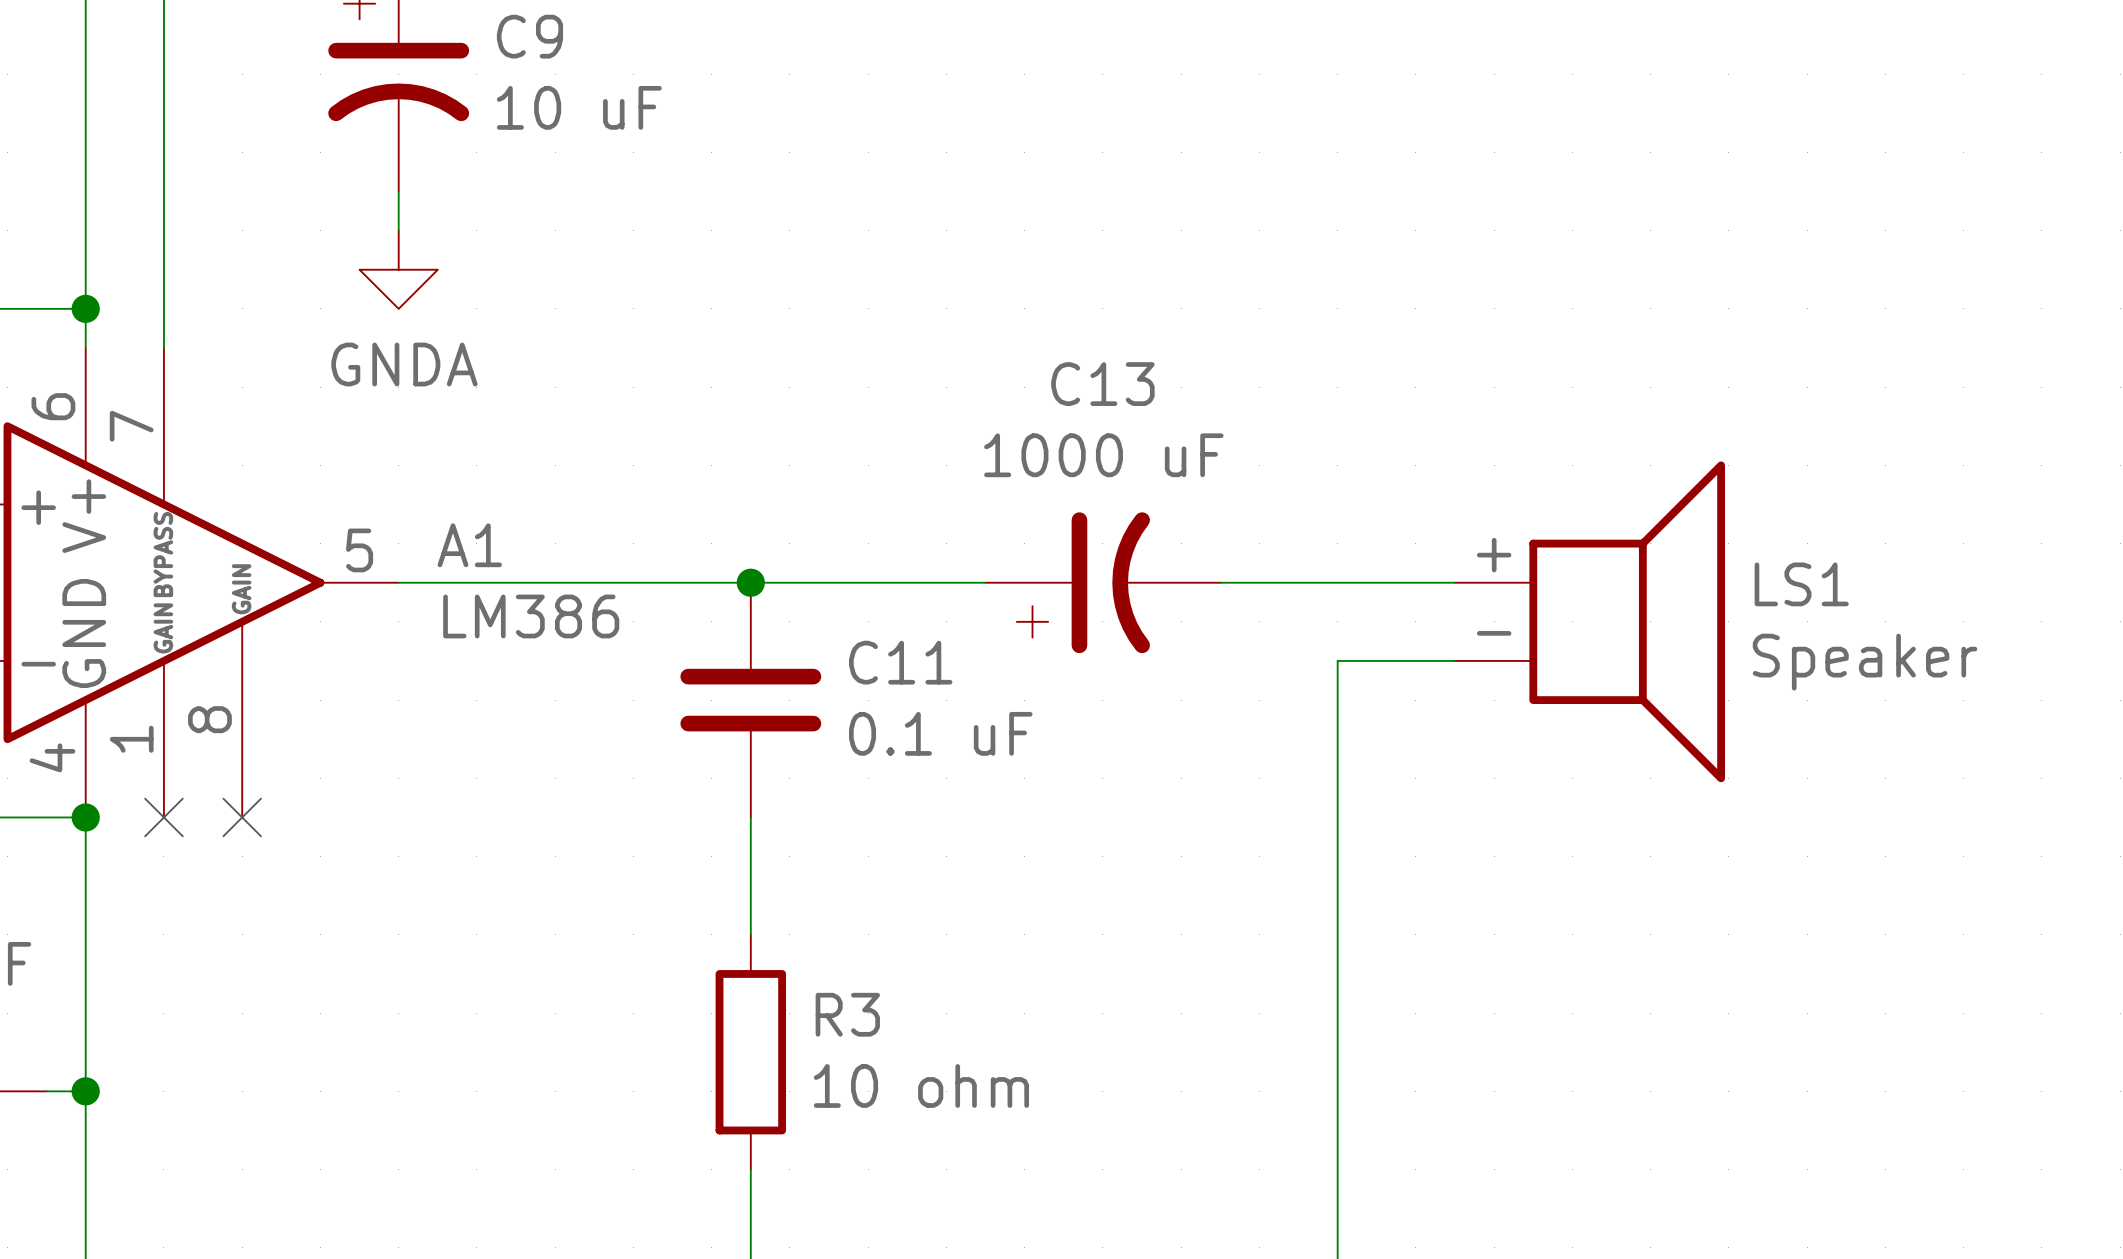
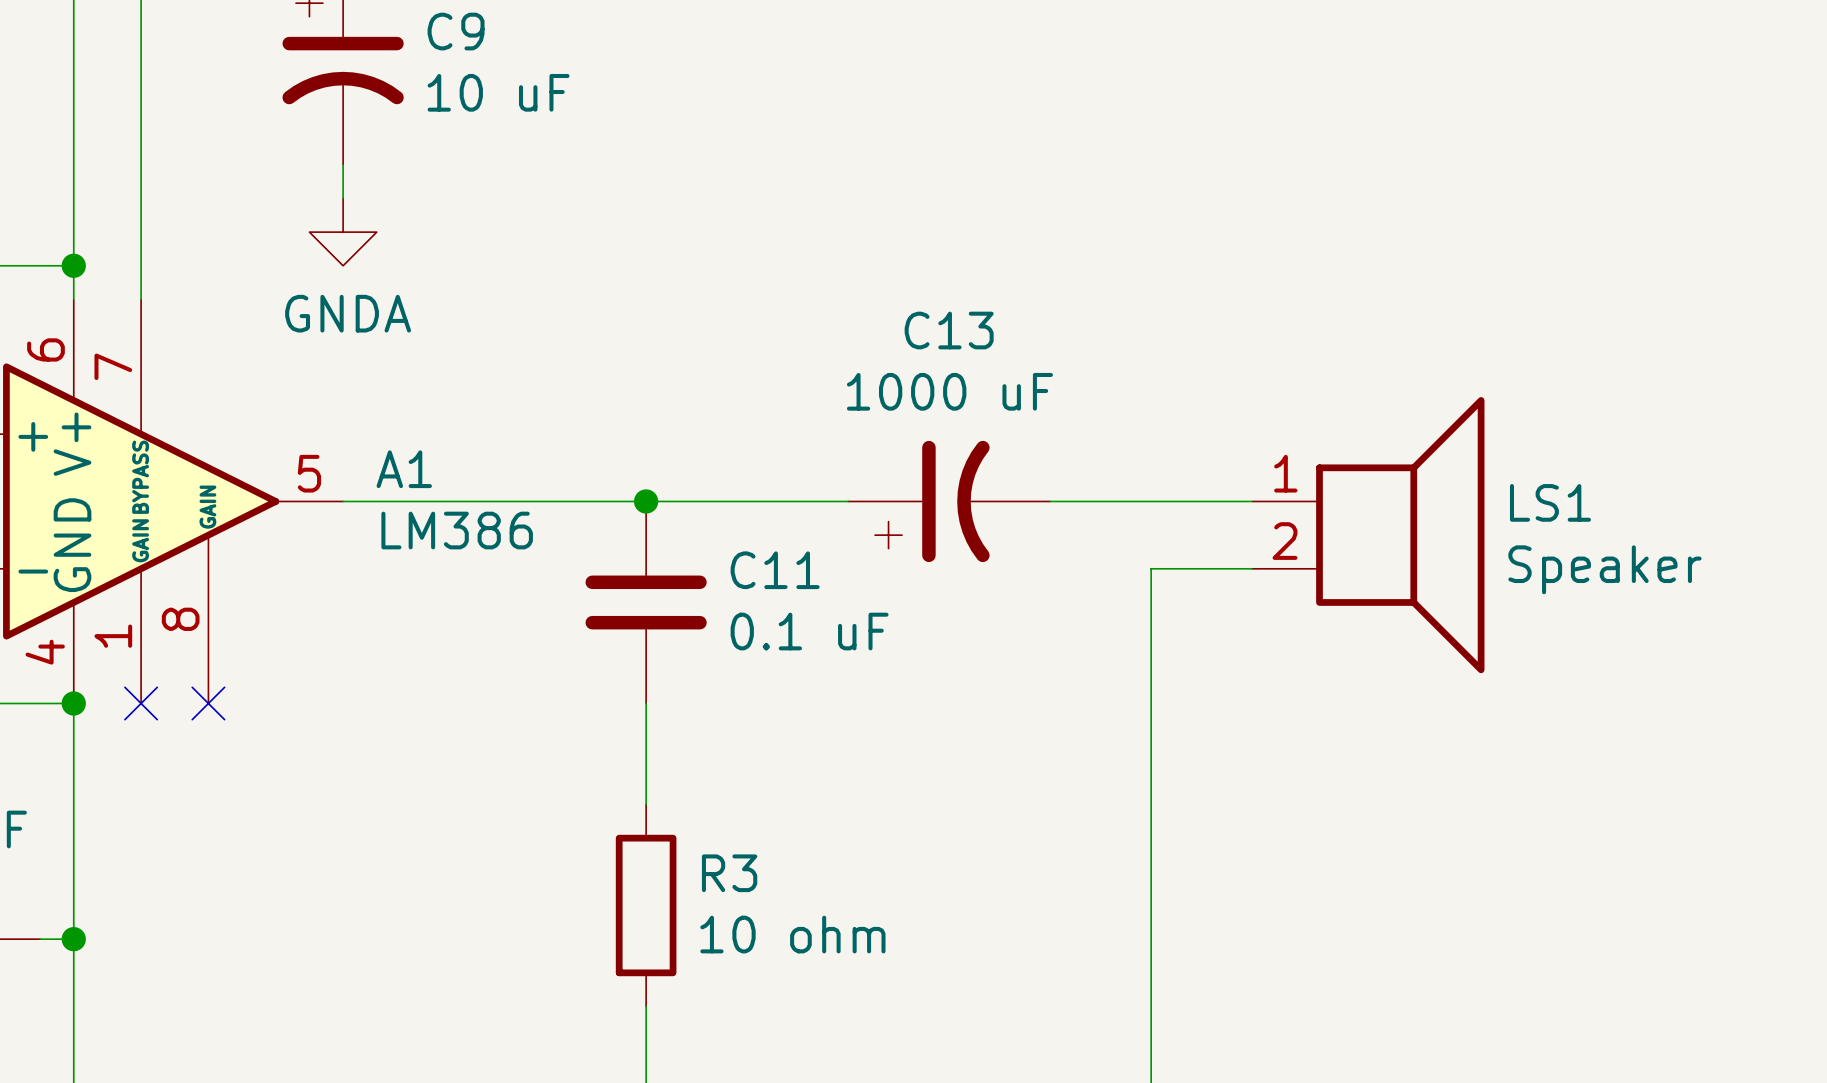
LS1 pin number: + (1494, 555) -> 1 (1285, 473)
LS1 pin number: - (1494, 633) -> 2 (1285, 541)

